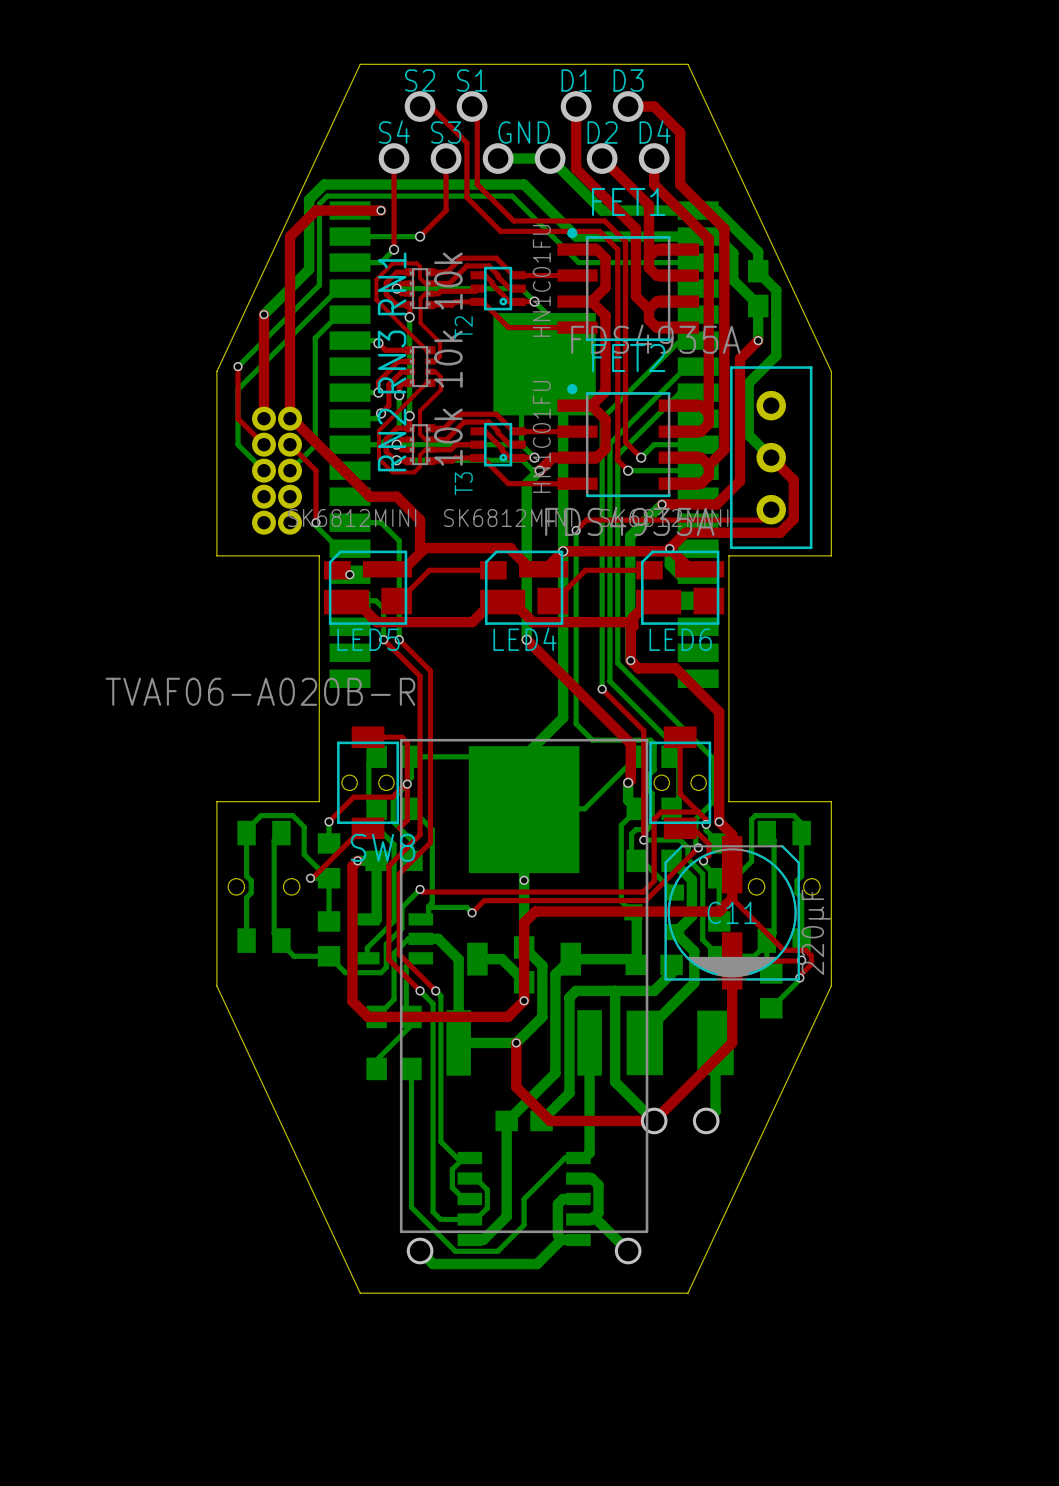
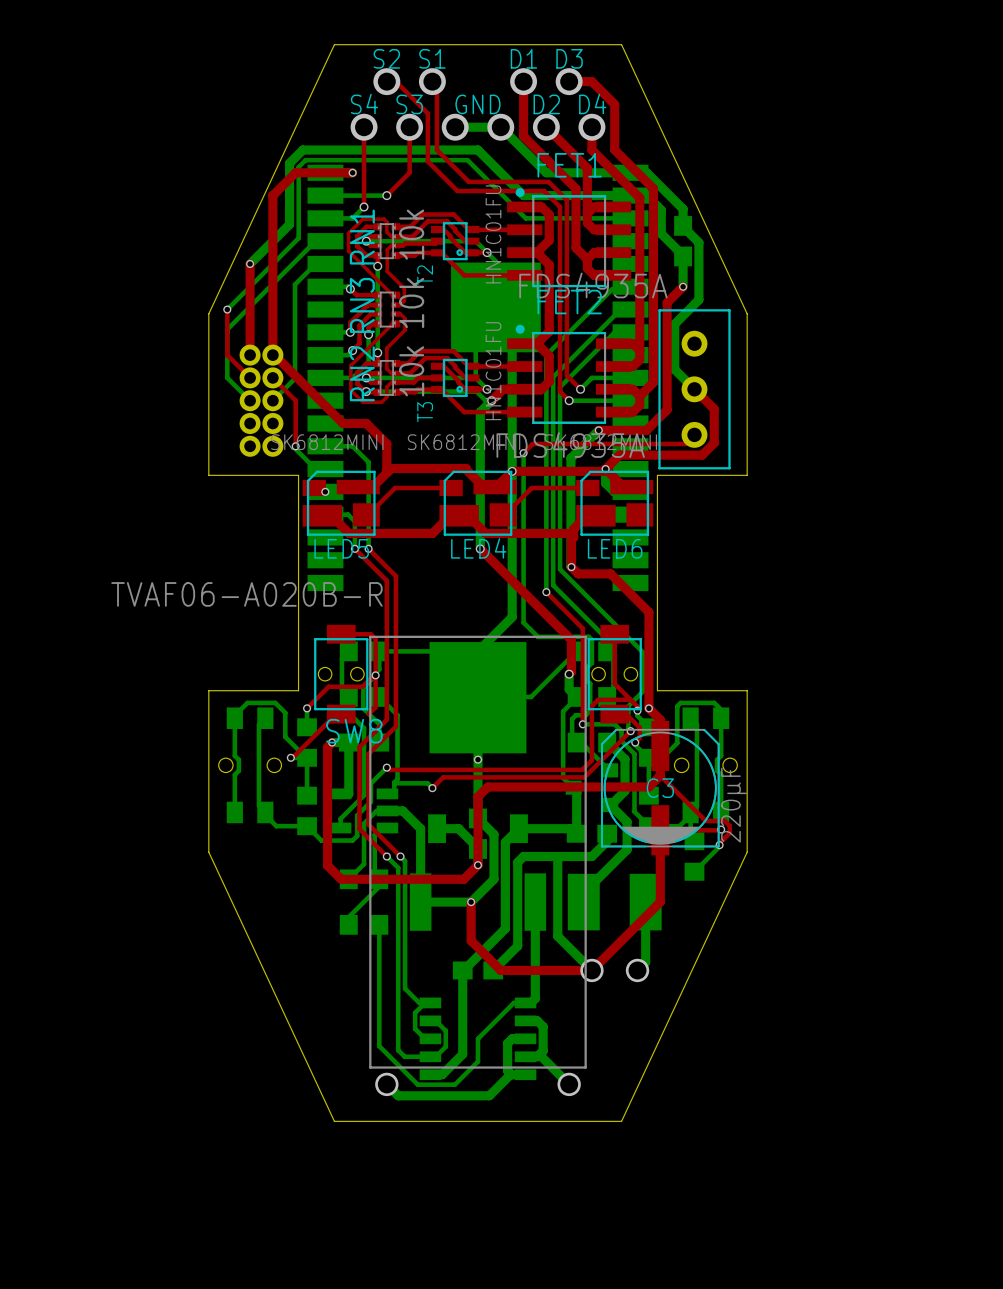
C11 name: C11 (732, 912) -> C3 (660, 788)

